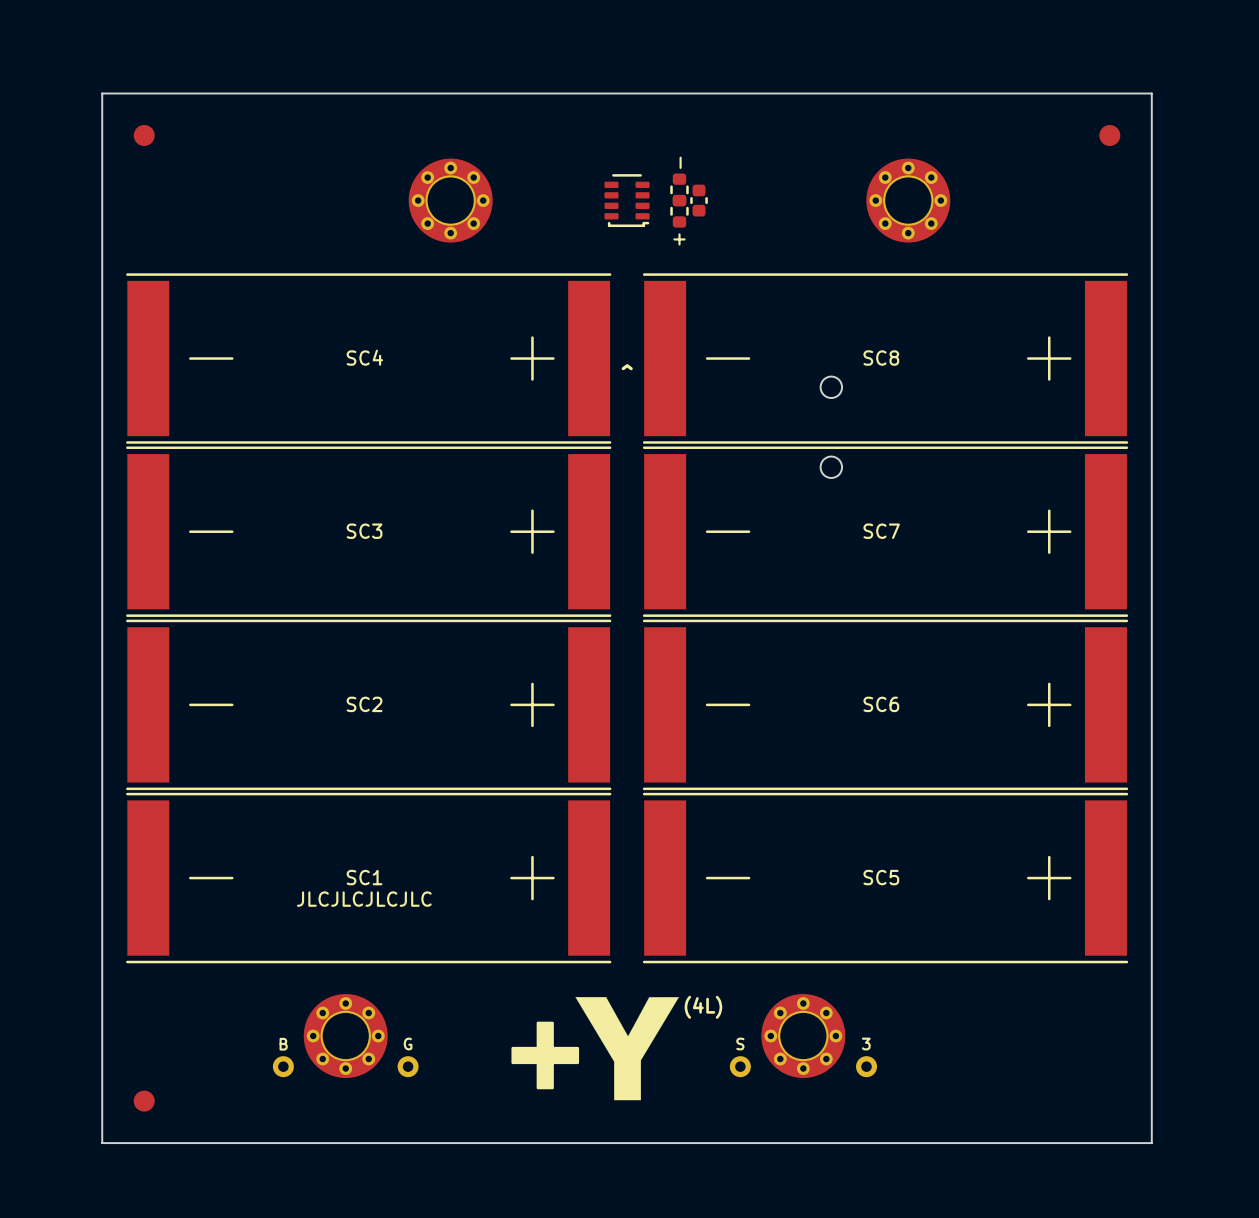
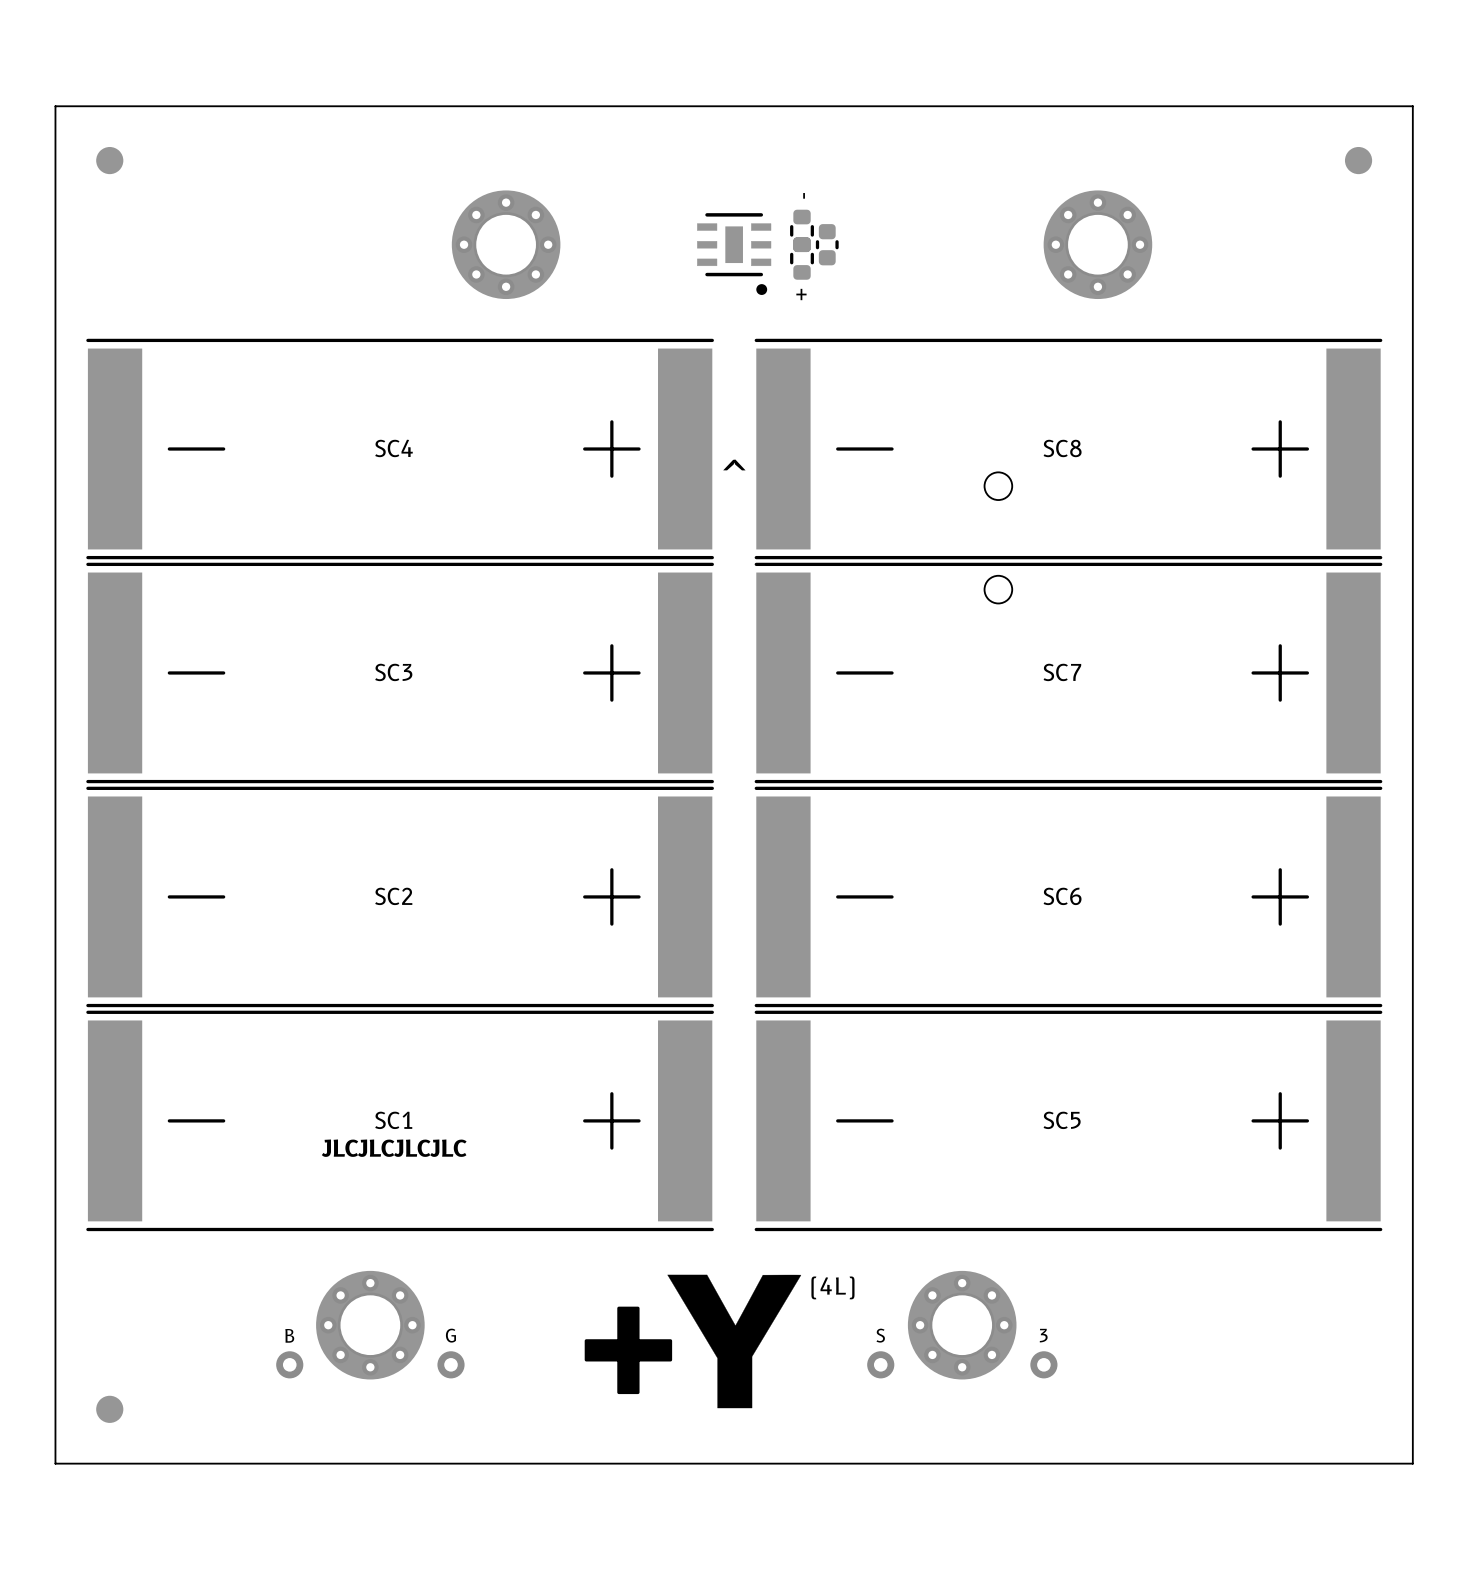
part footprint: [604, 174, 650, 228] -> [697, 213, 772, 295]

